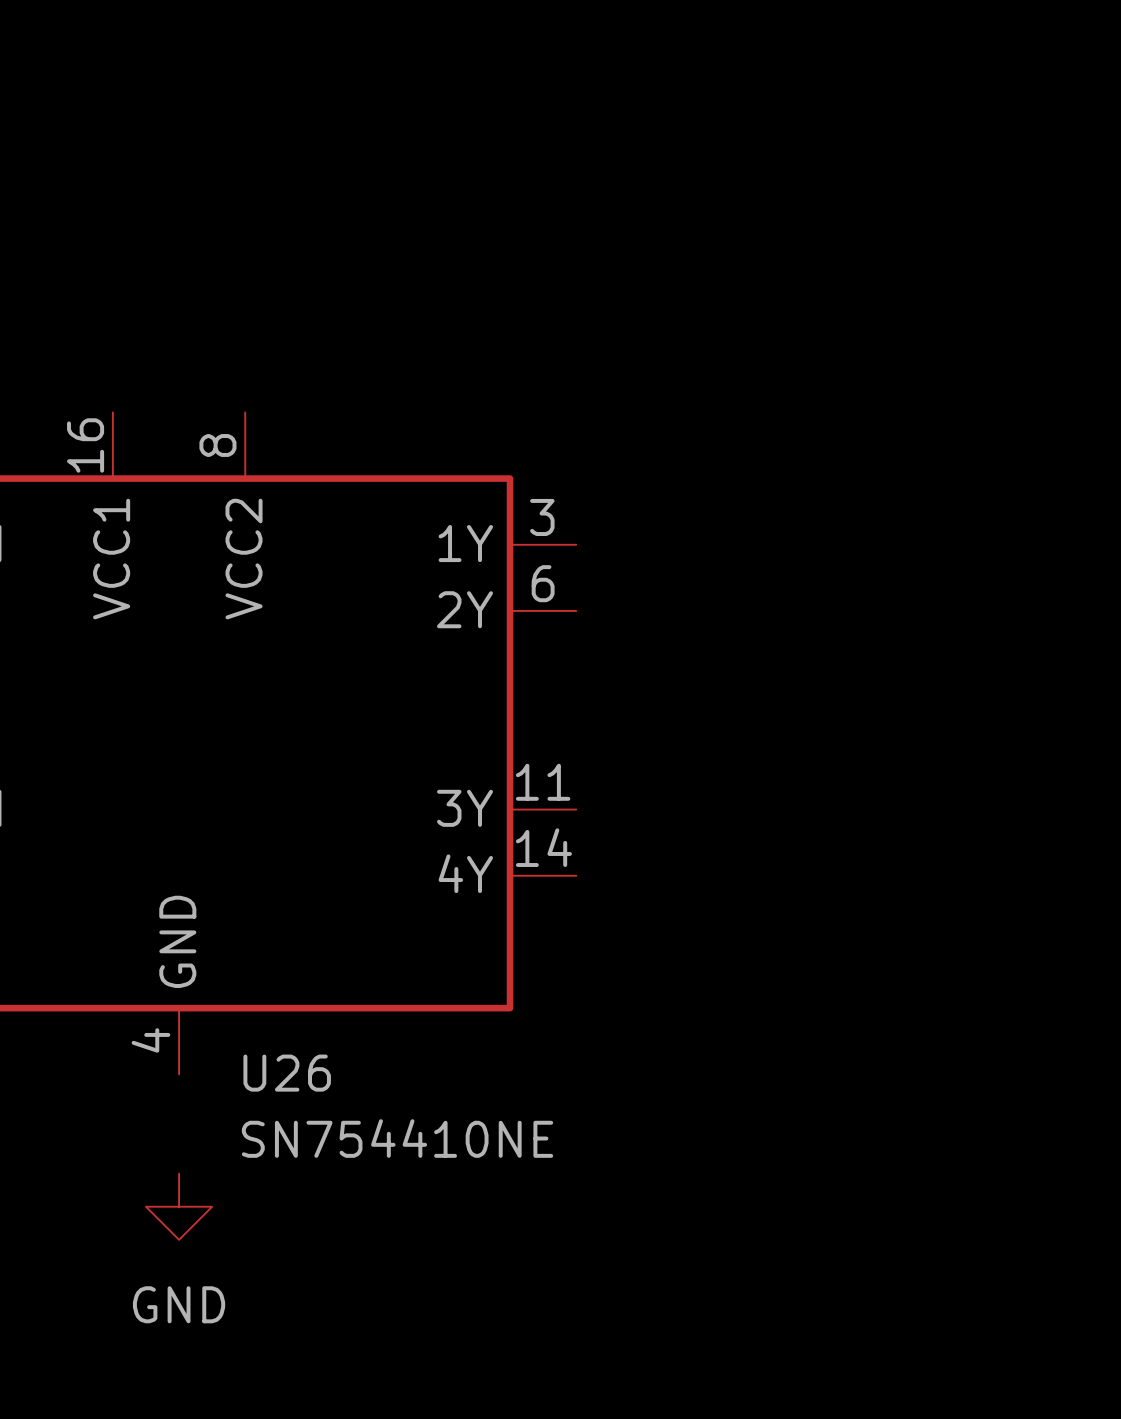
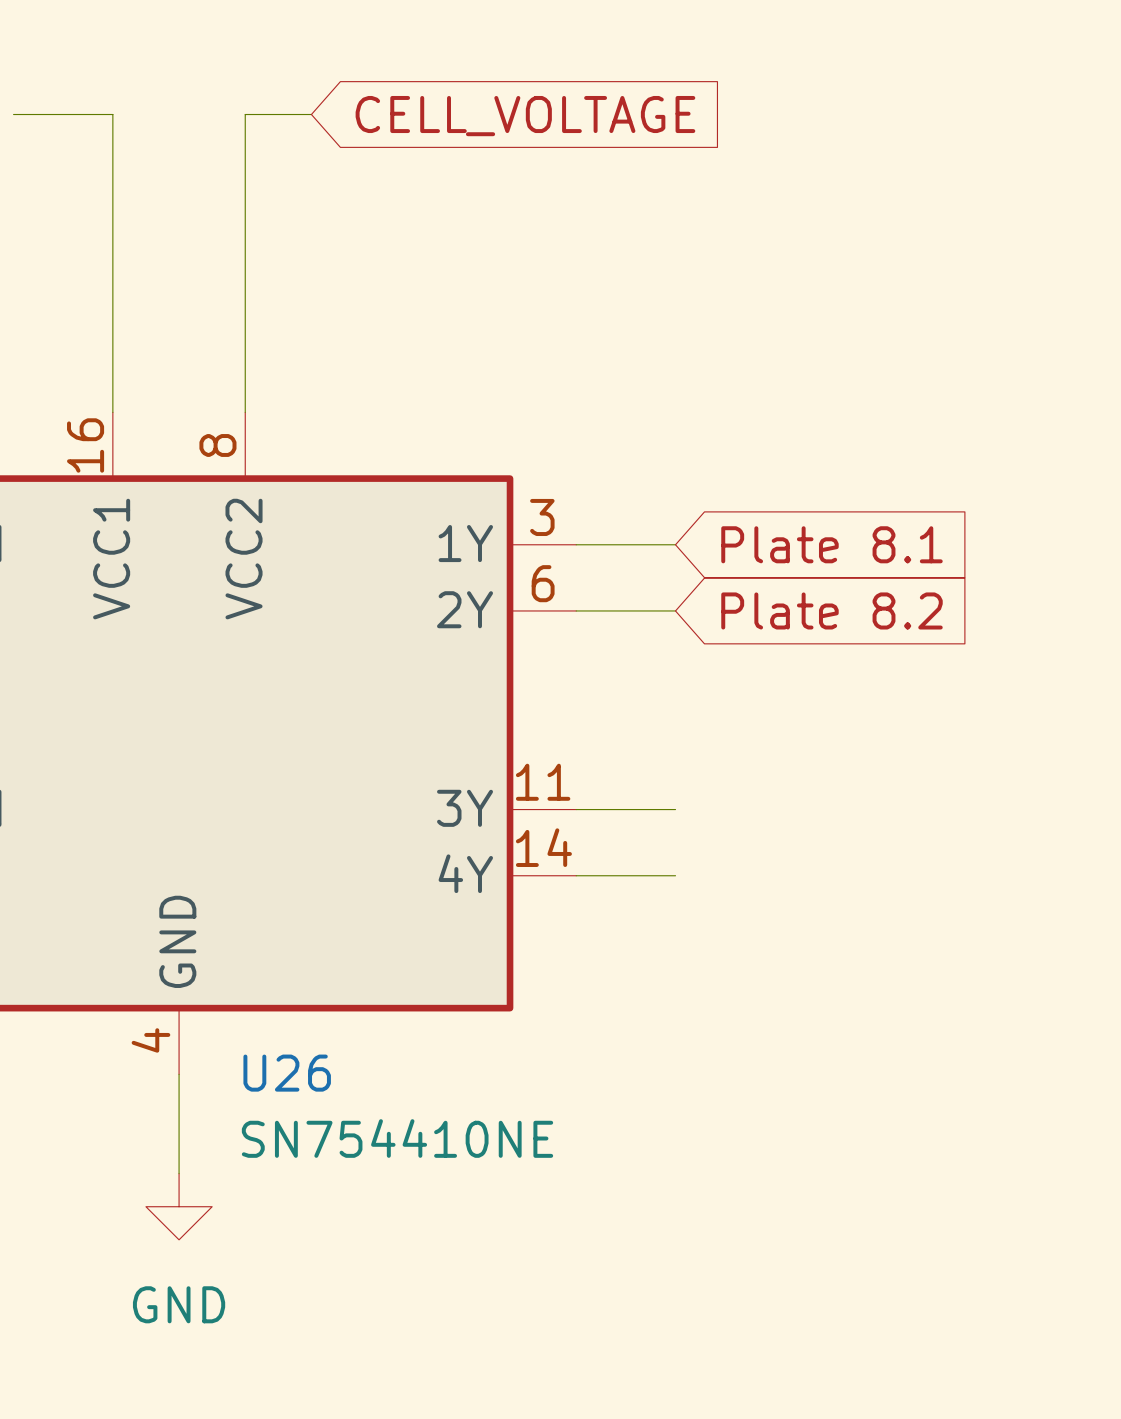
wire: none -> (13, 114) (112, 114) (112, 412)
wire: none -> (311, 114) (245, 114) (245, 412)
global label: none -> CELL_VOLTAGE (525, 116)
wire: none -> (576, 544) (675, 544)
global label: none -> Plate 8.1 (832, 544)
wire: none -> (576, 610) (675, 610)
global label: none -> Plate 8.2 (832, 610)
wire: none -> (576, 809) (675, 809)
wire: none -> (576, 875) (675, 875)
wire: none -> (179, 1074) (179, 1173)

